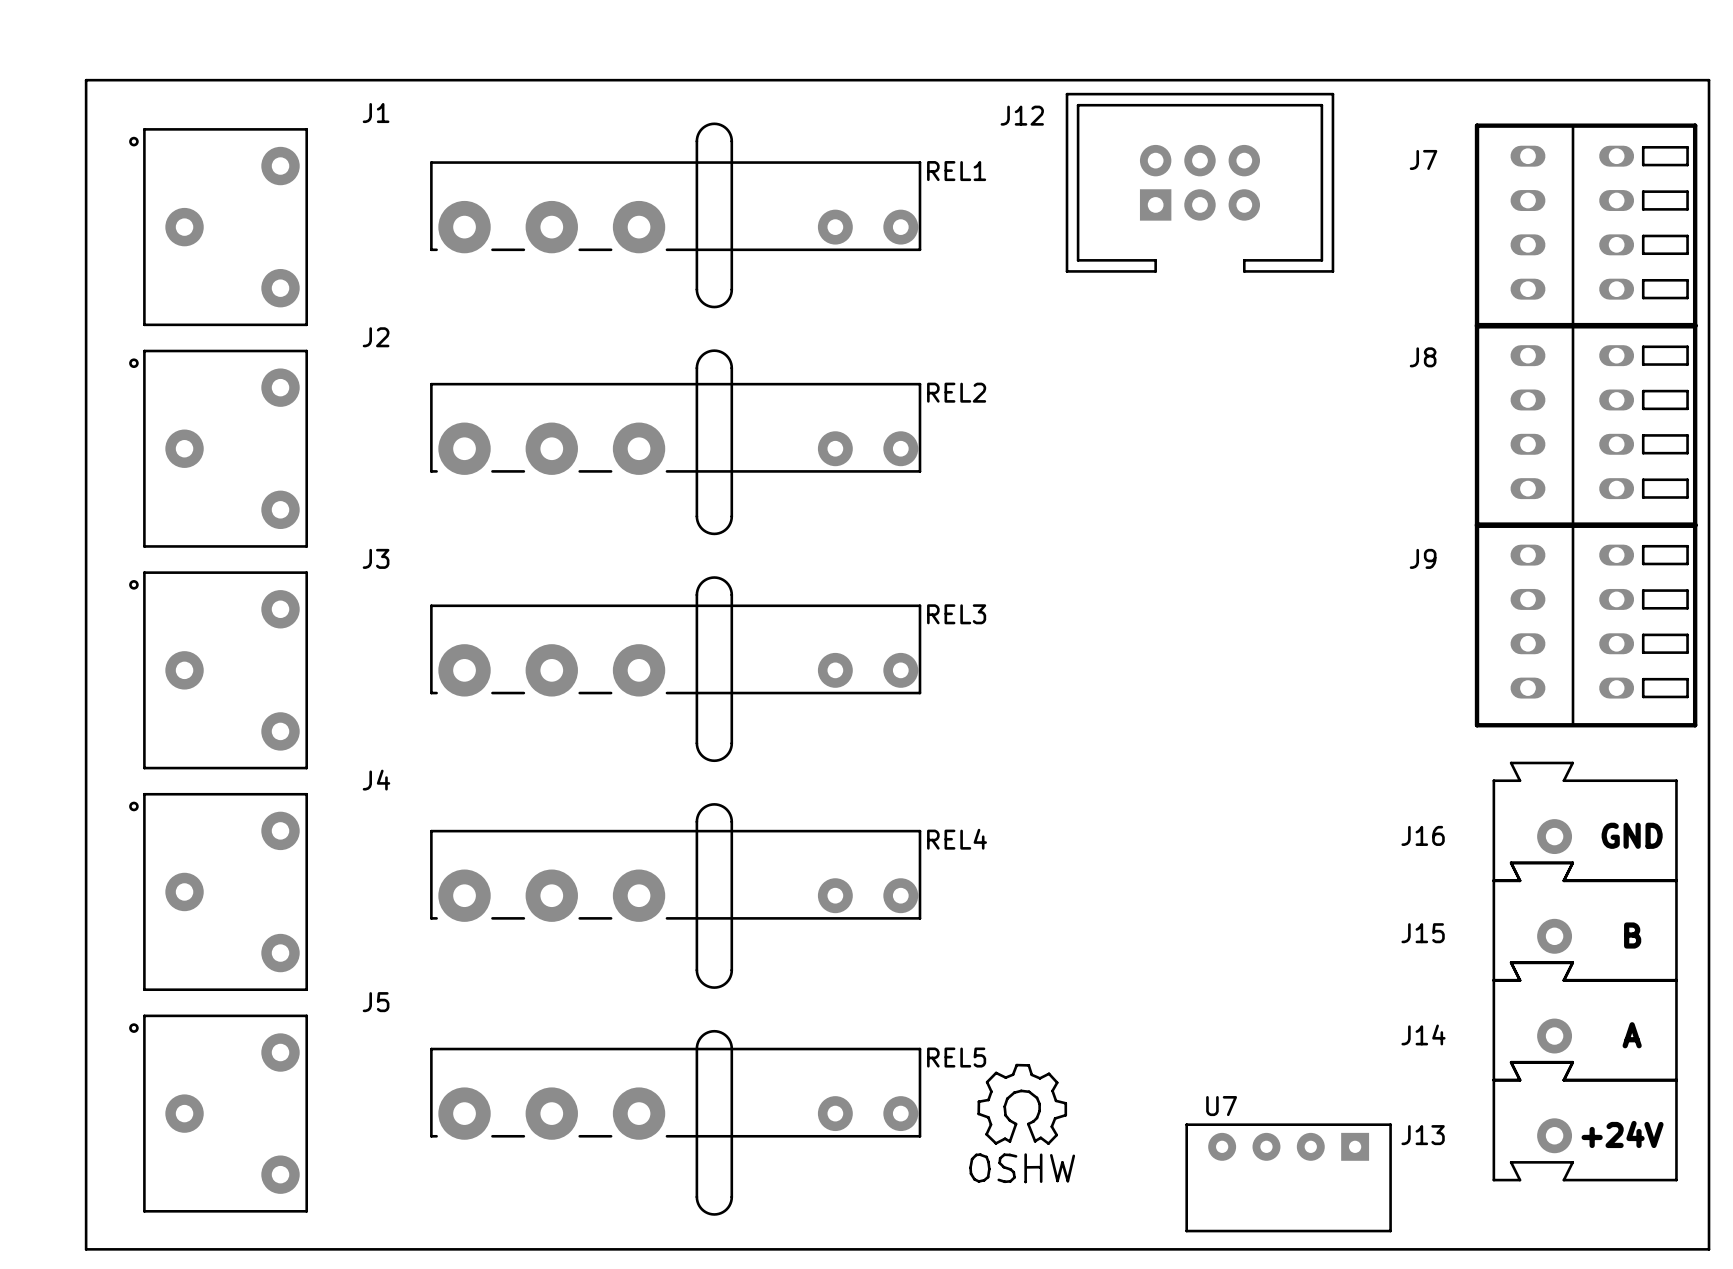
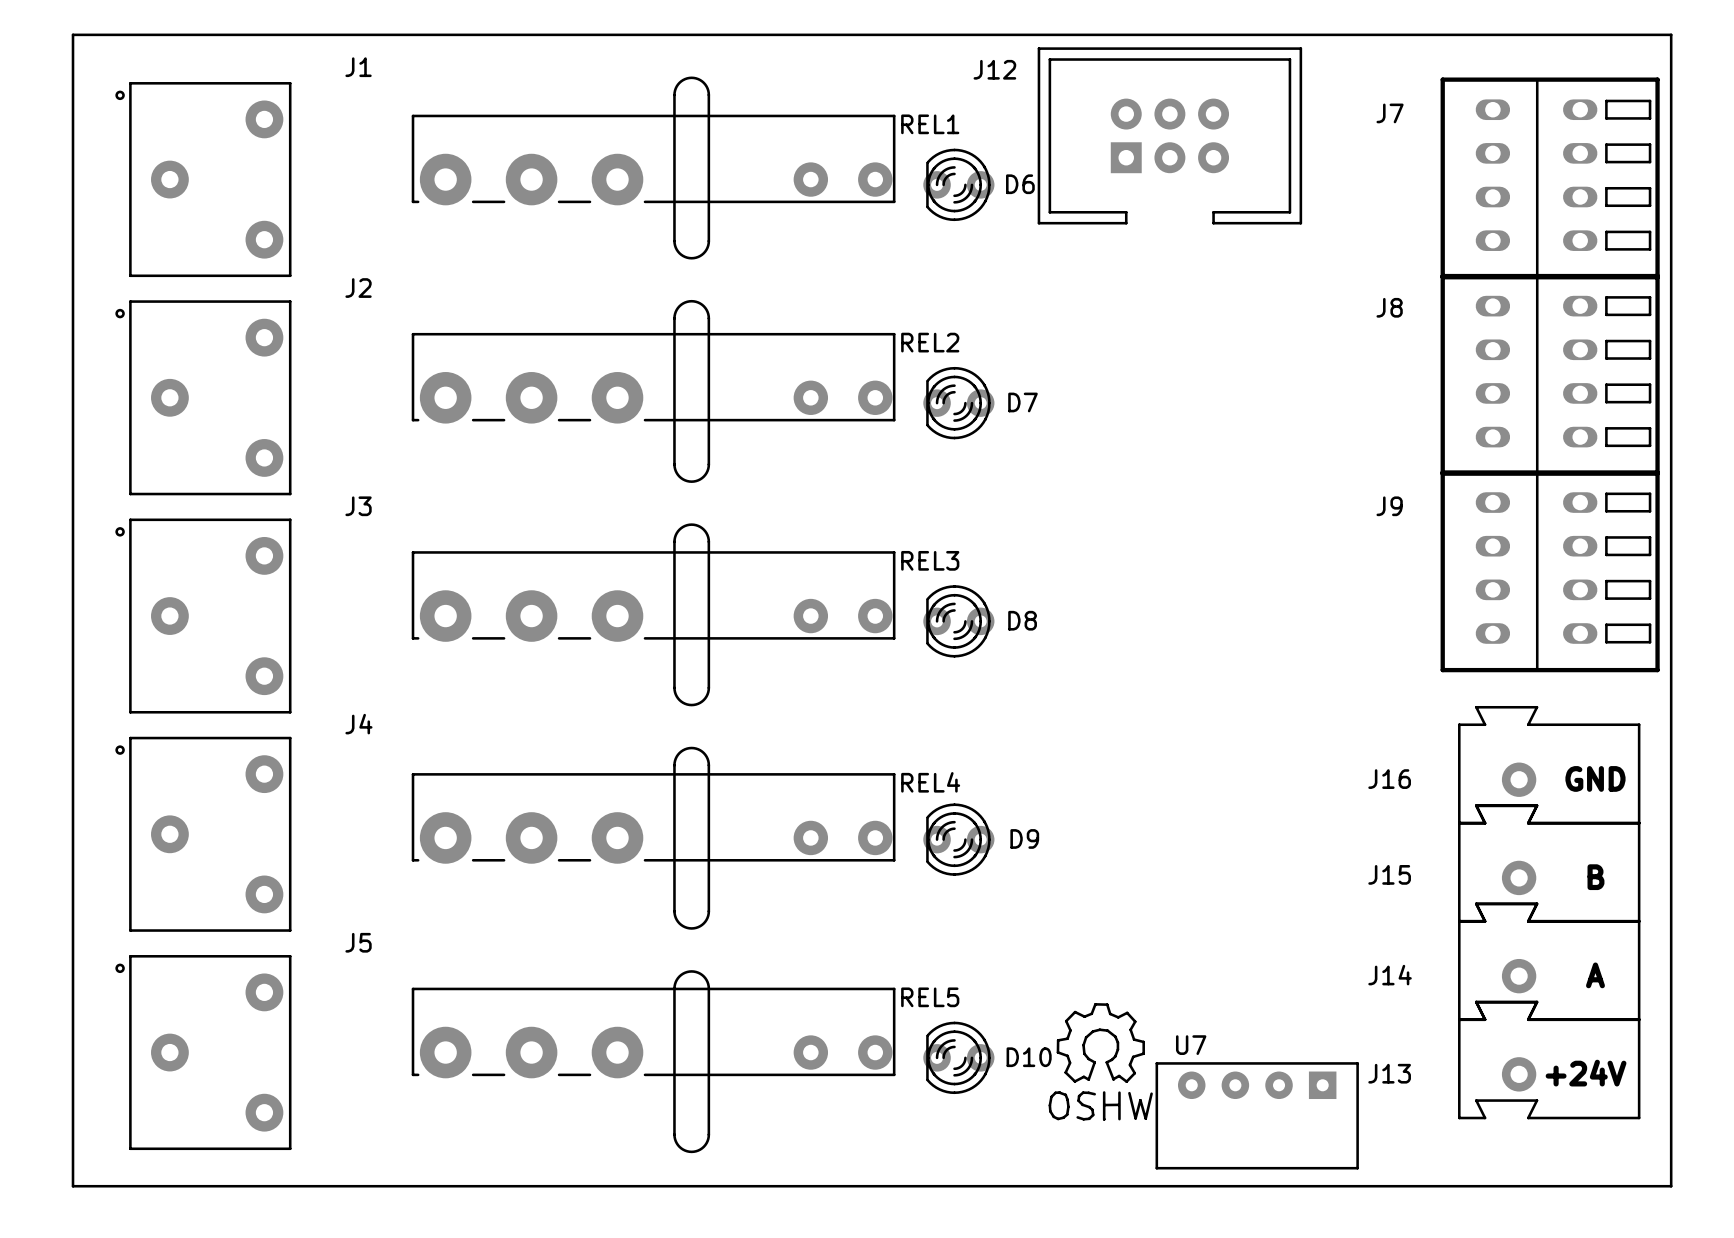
D6: none -> (958, 184)
D7: none -> (958, 403)
D8: none -> (958, 621)
D9: none -> (958, 839)
D10: none -> (958, 1057)
drawing position: (1022, 1123) -> (1100, 1061)

